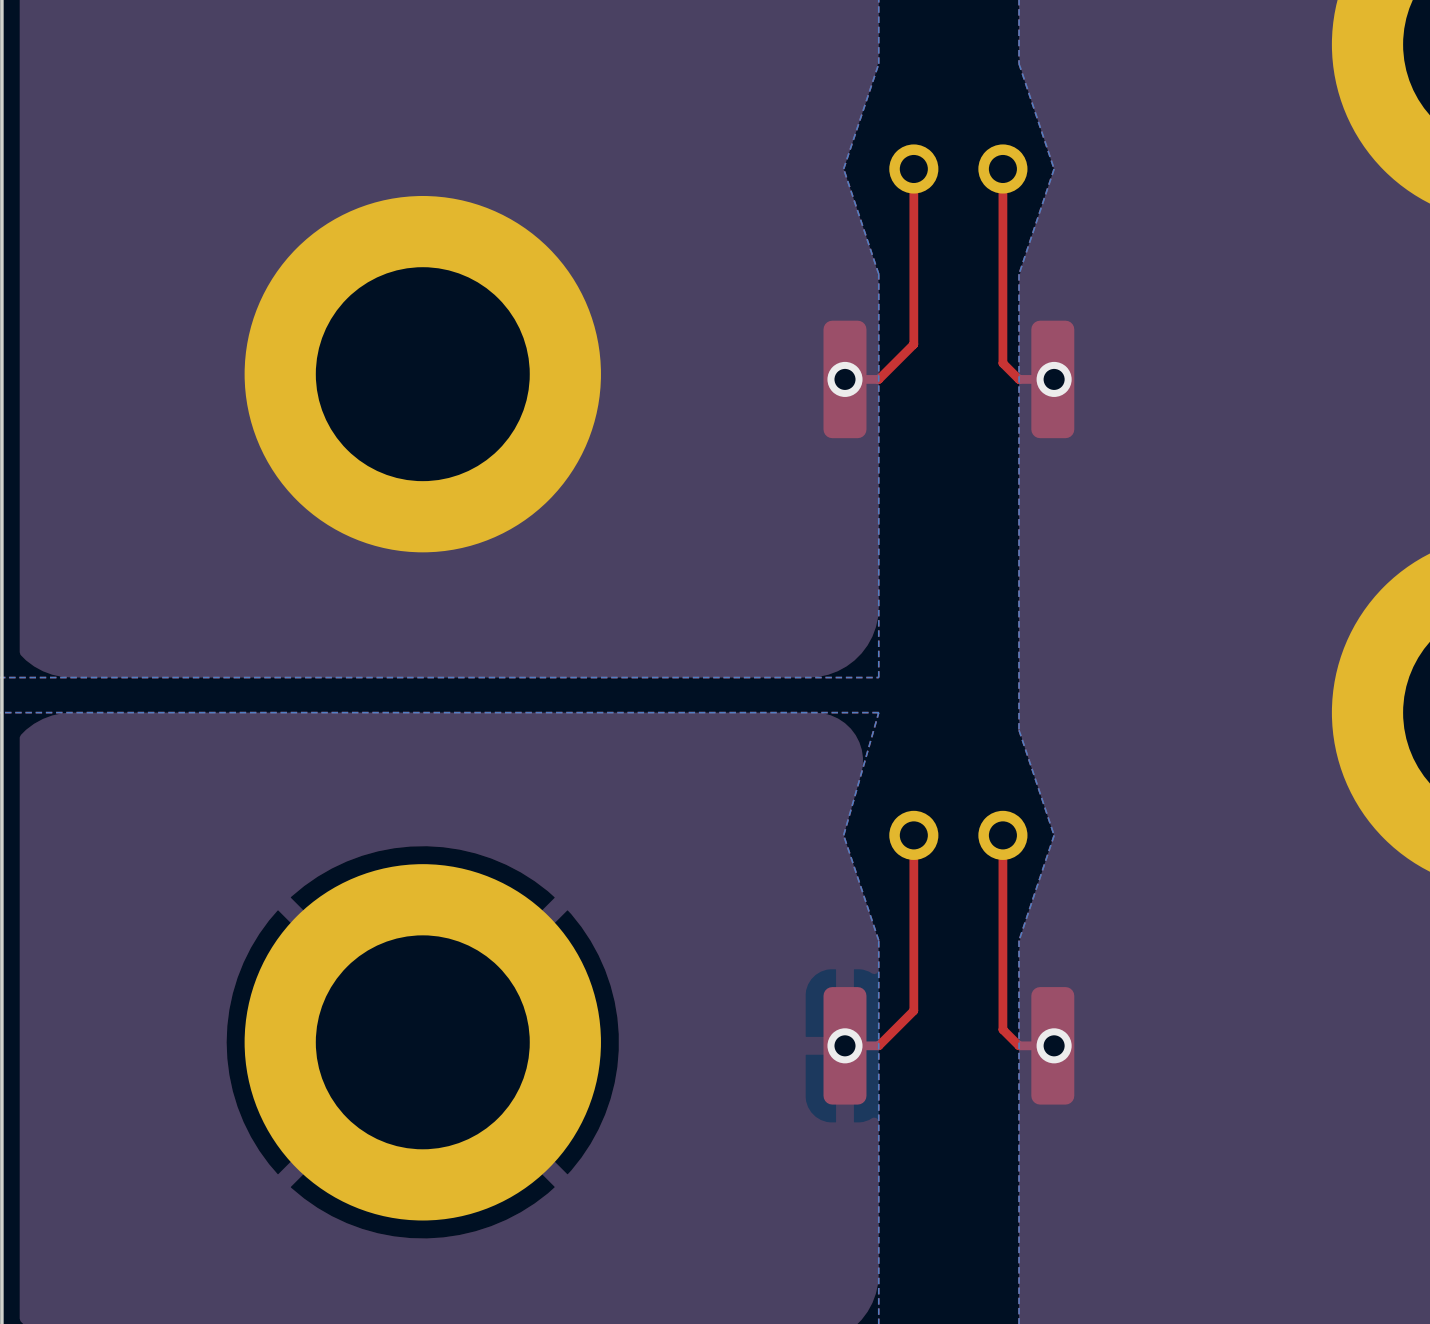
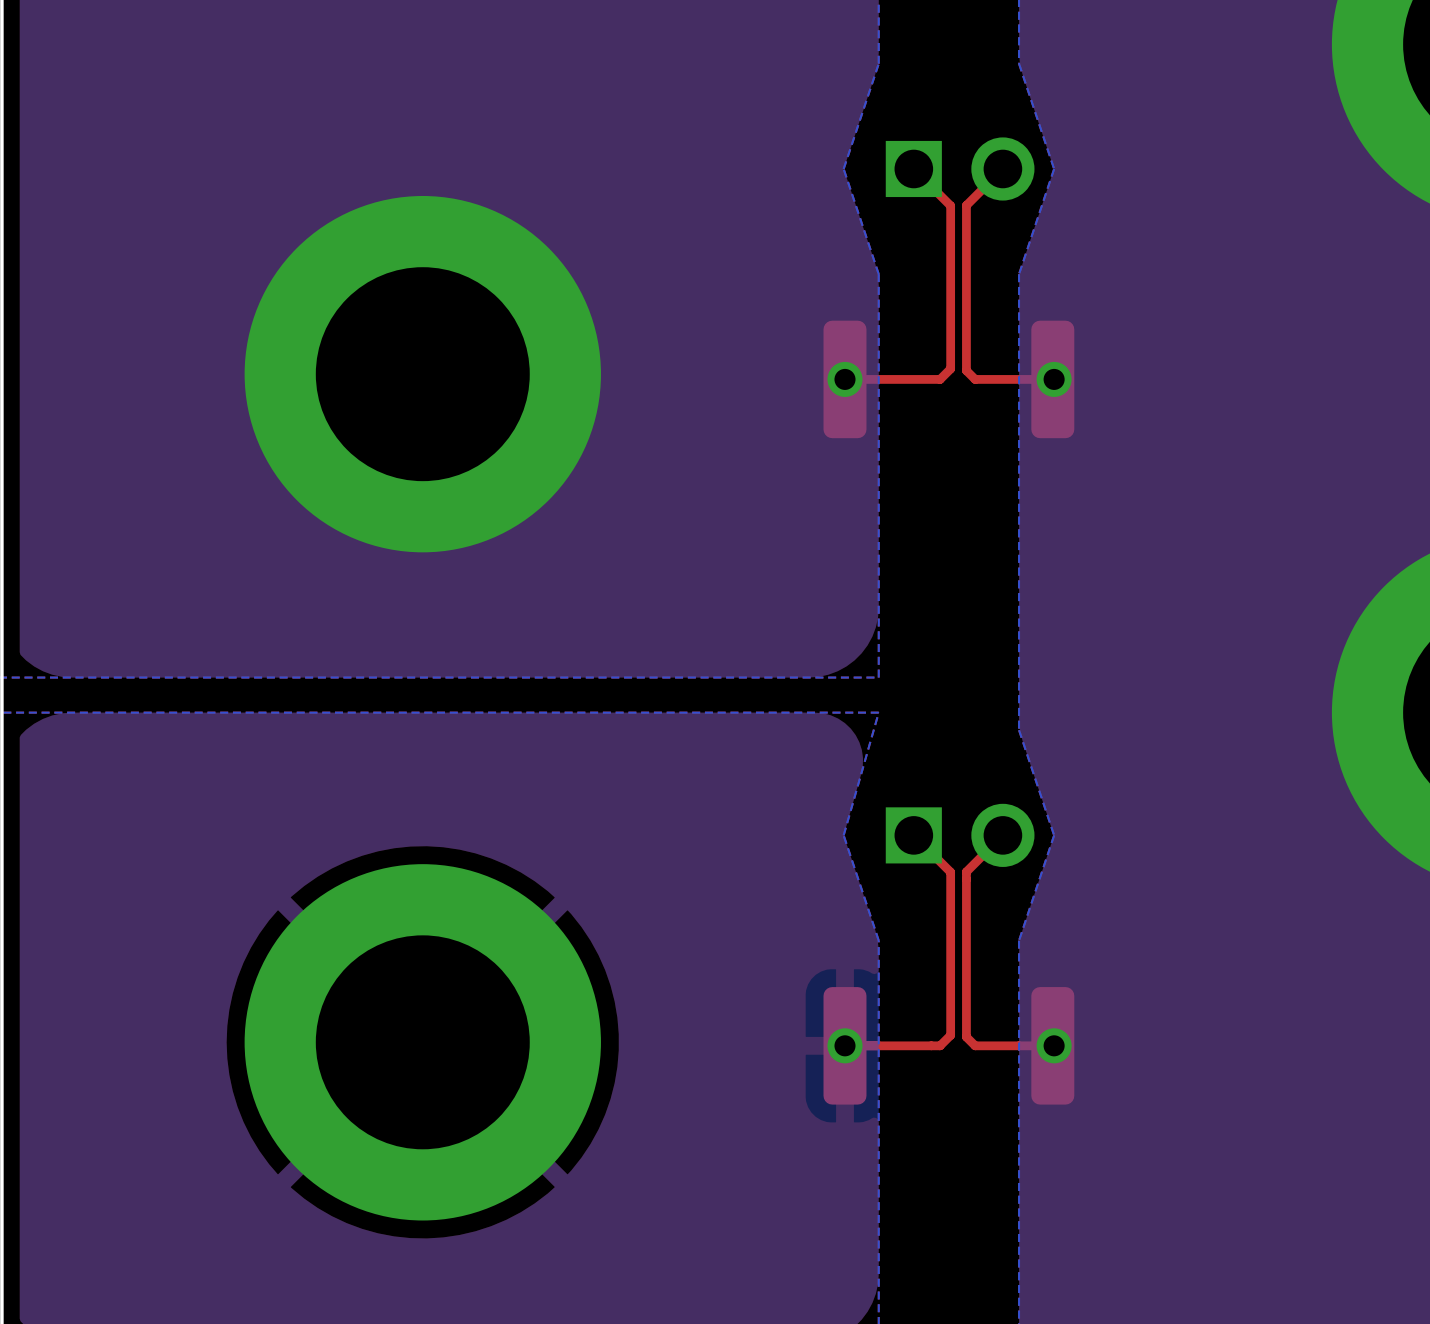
part footprint: [889, 144, 1028, 194] -> [885, 137, 1035, 201]
top track: (913, 168) (913, 344) (878, 379) -> (913, 168) (950, 205) (950, 368) (940, 379) (878, 379)
top track: (1002, 168) (1002, 363) (1019, 379) -> (1002, 168) (966, 205) (966, 370) (975, 379) (1019, 379)
part footprint: [889, 810, 1028, 860] -> [885, 803, 1035, 867]
top track: (913, 835) (913, 1010) (878, 1045) -> (913, 835) (950, 872) (950, 1035) (940, 1045) (878, 1045)
top track: (1002, 835) (1002, 1029) (1019, 1045) -> (1002, 835) (966, 871) (966, 1037) (975, 1045) (1019, 1045)

